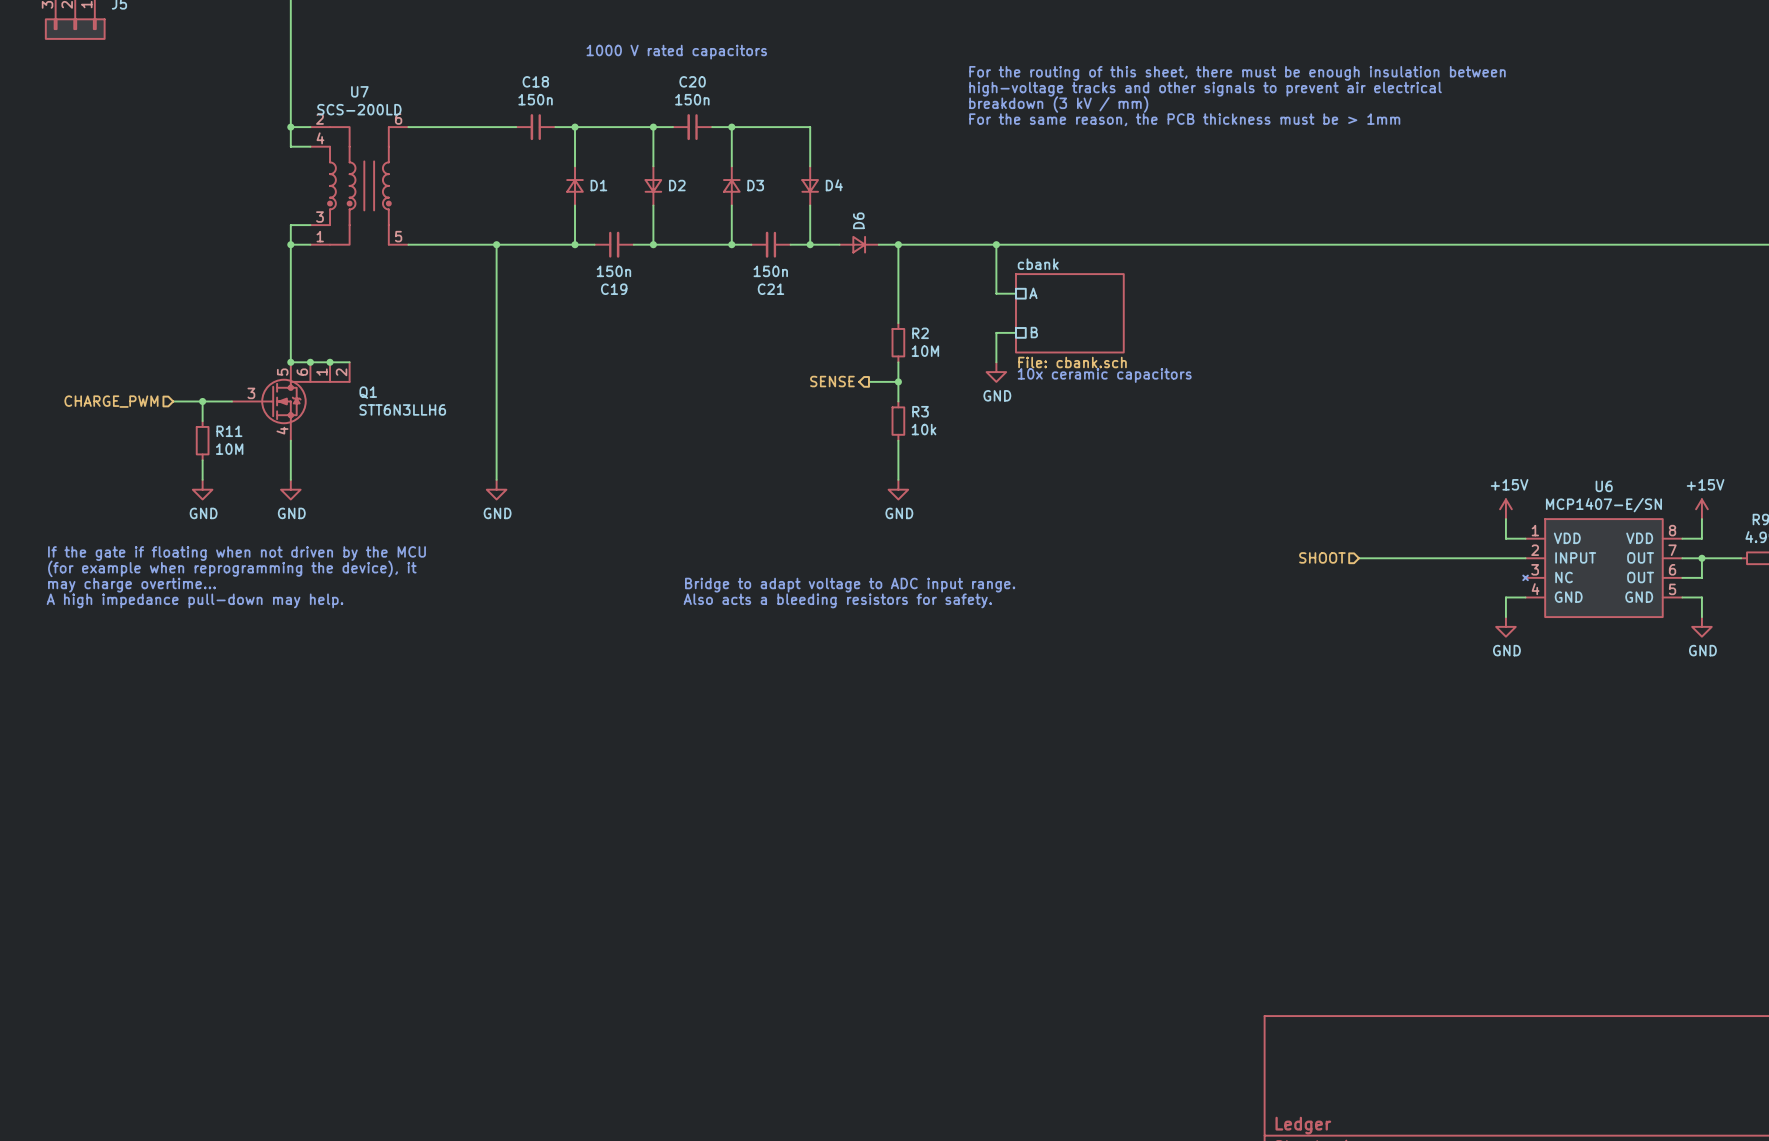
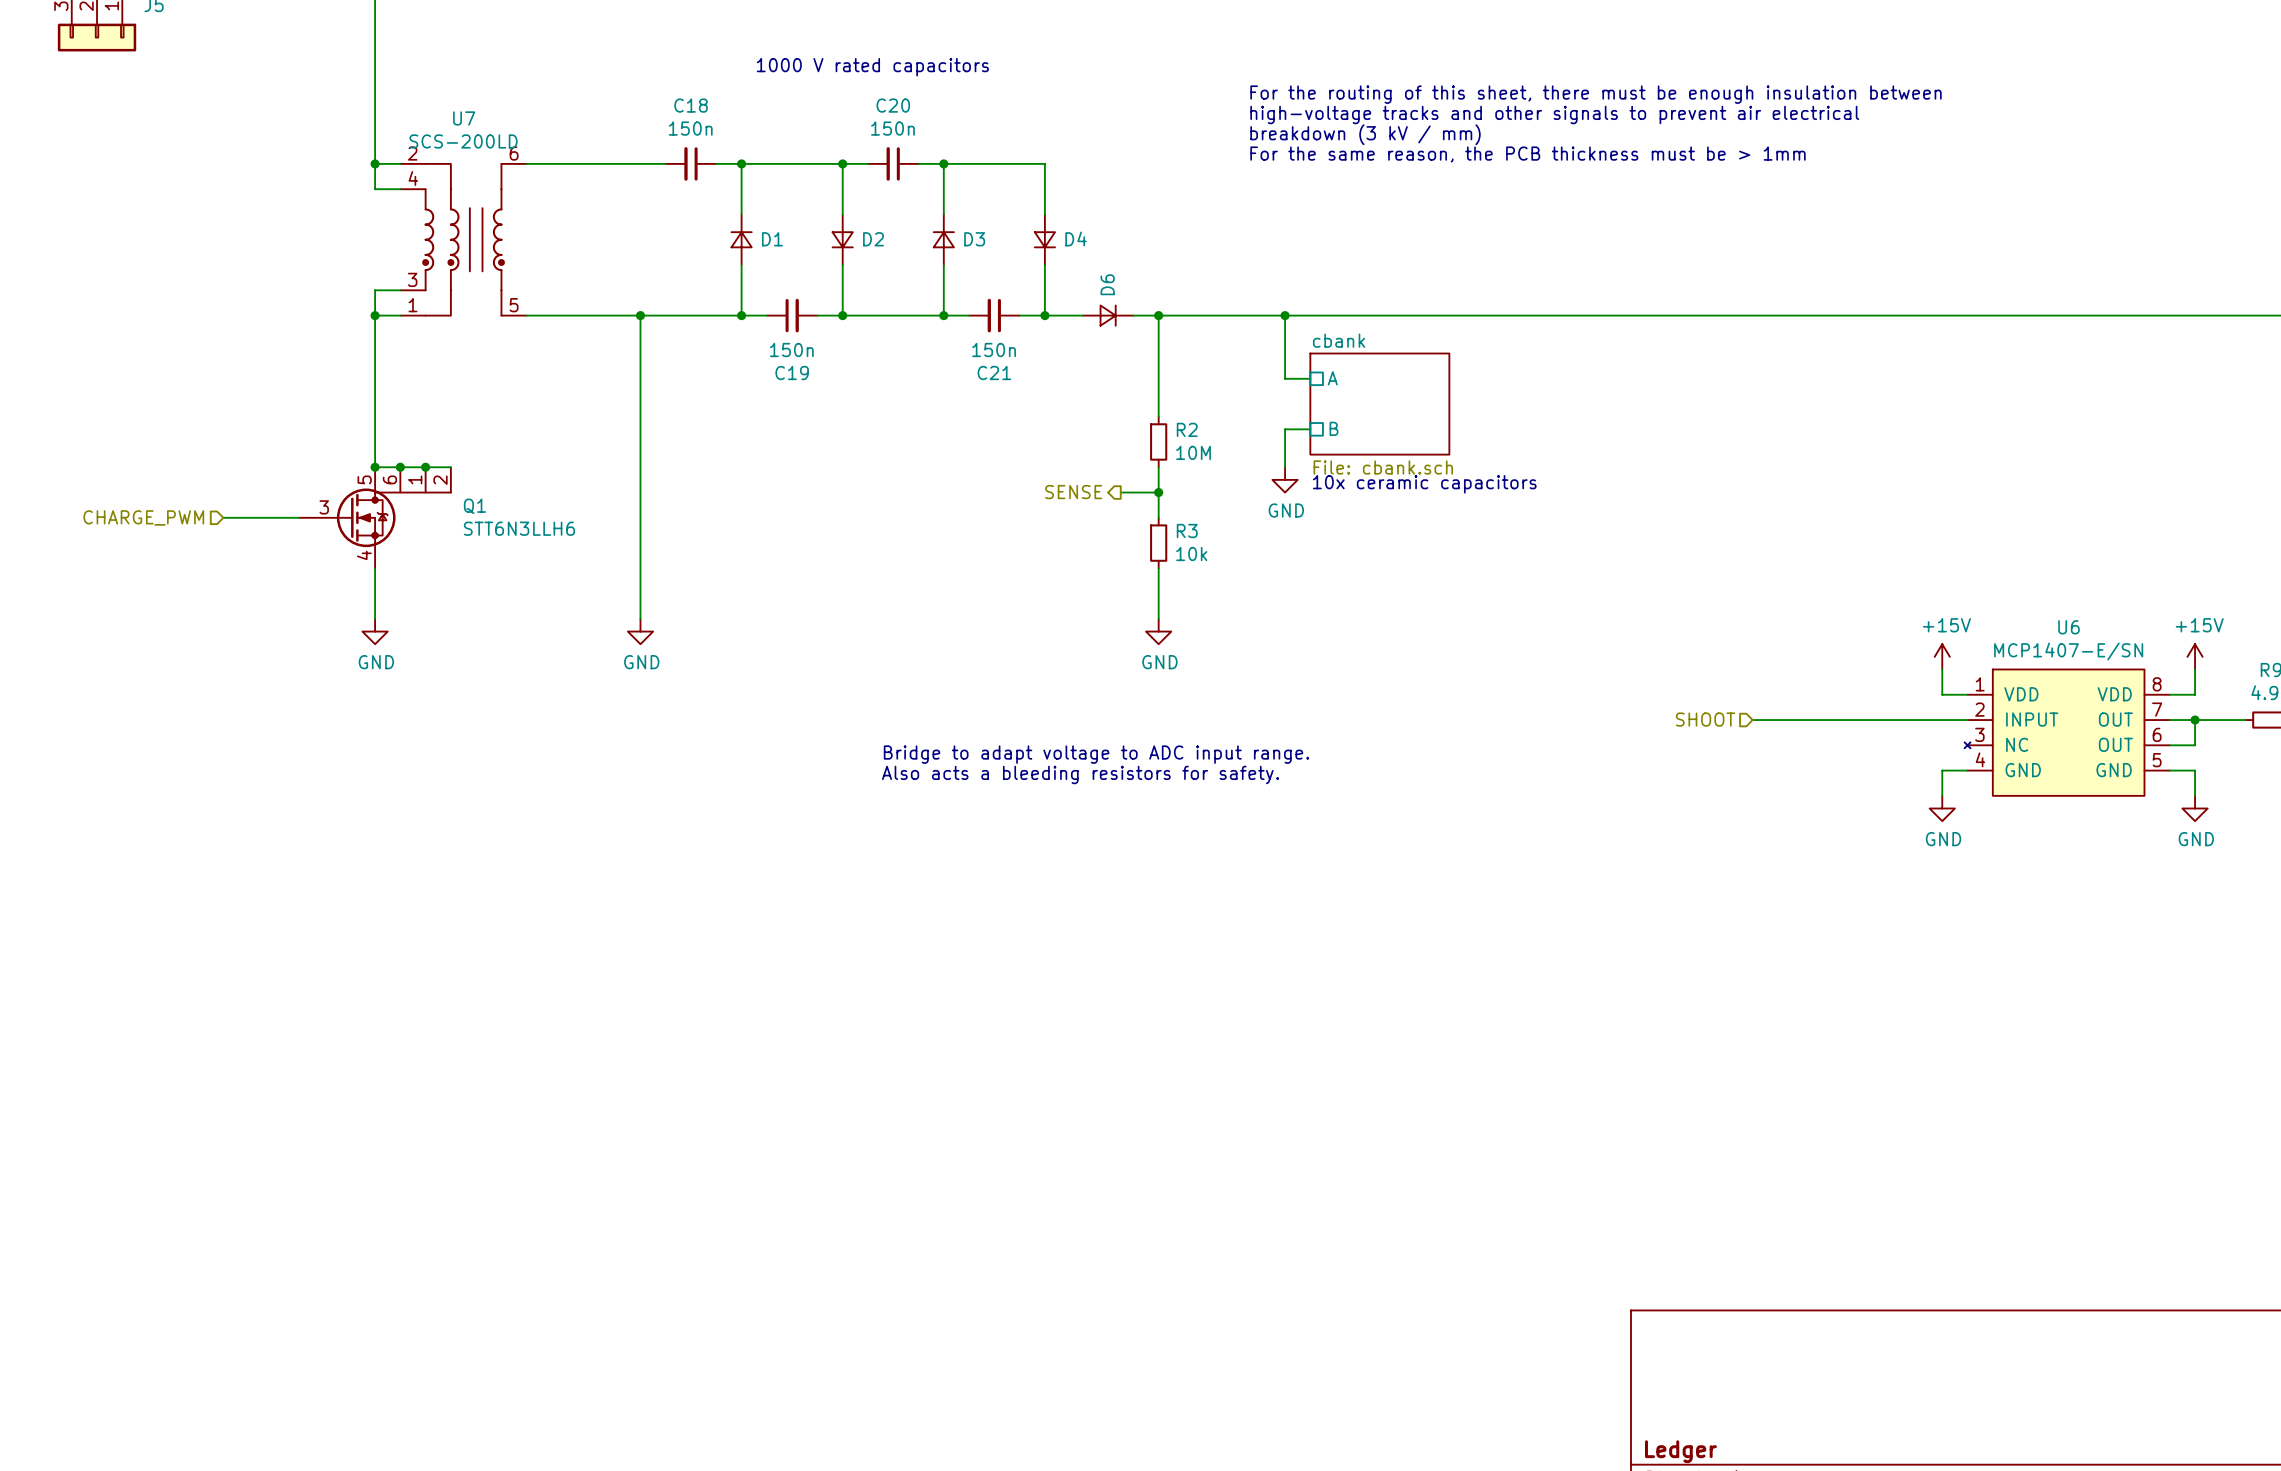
wire: (202, 401) (202, 421) -> none
junction: (202, 401) -> none
R11: 10M (202, 440) -> none
wire: (202, 460) (202, 479) -> none
power symbol: GND (202, 489) -> none
text: If the gate if floating when not driven by the MCU (236, 553) -> none
text: (for example when reprogramming the device), it (232, 568) -> none
text: may charge overtime... (132, 585) -> none
text: A high impedance pull-down may help. (195, 600) -> none

